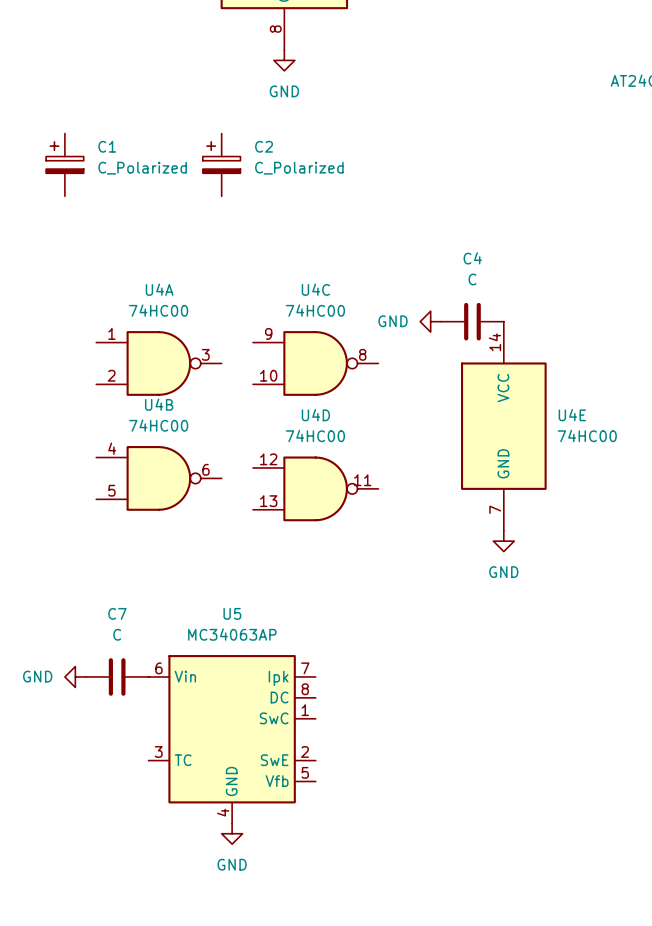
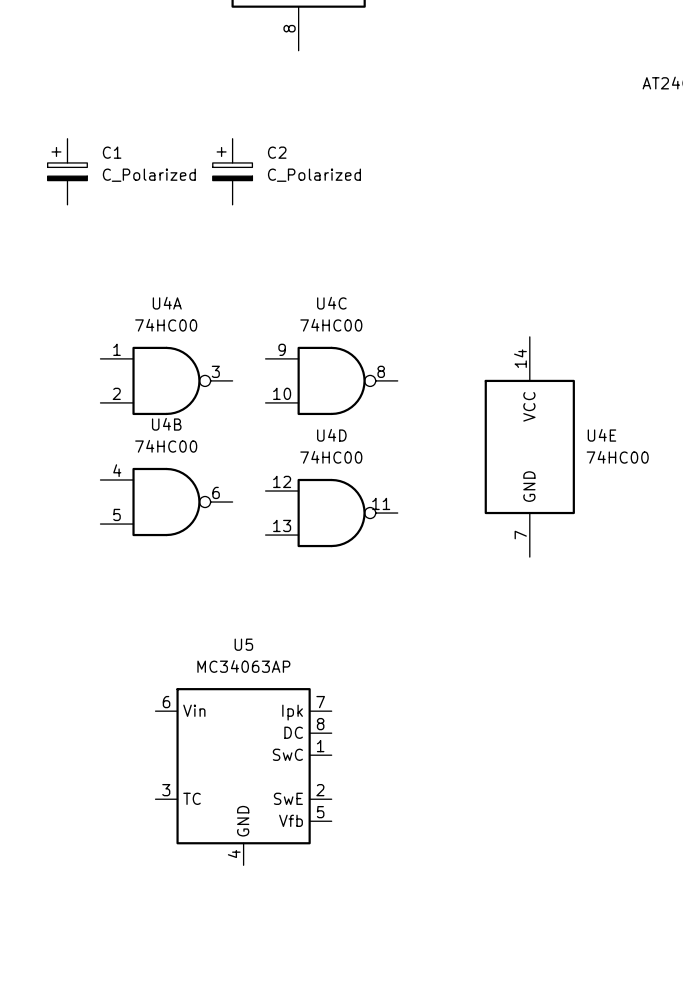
power symbol: GND (284, 60) -> none
power symbol: GND (430, 321) -> none
C4: C (472, 321) -> none
power symbol: GND (503, 541) -> none
power symbol: GND (75, 676) -> none
C7: C (117, 676) -> none
power symbol: GND (232, 833) -> none

